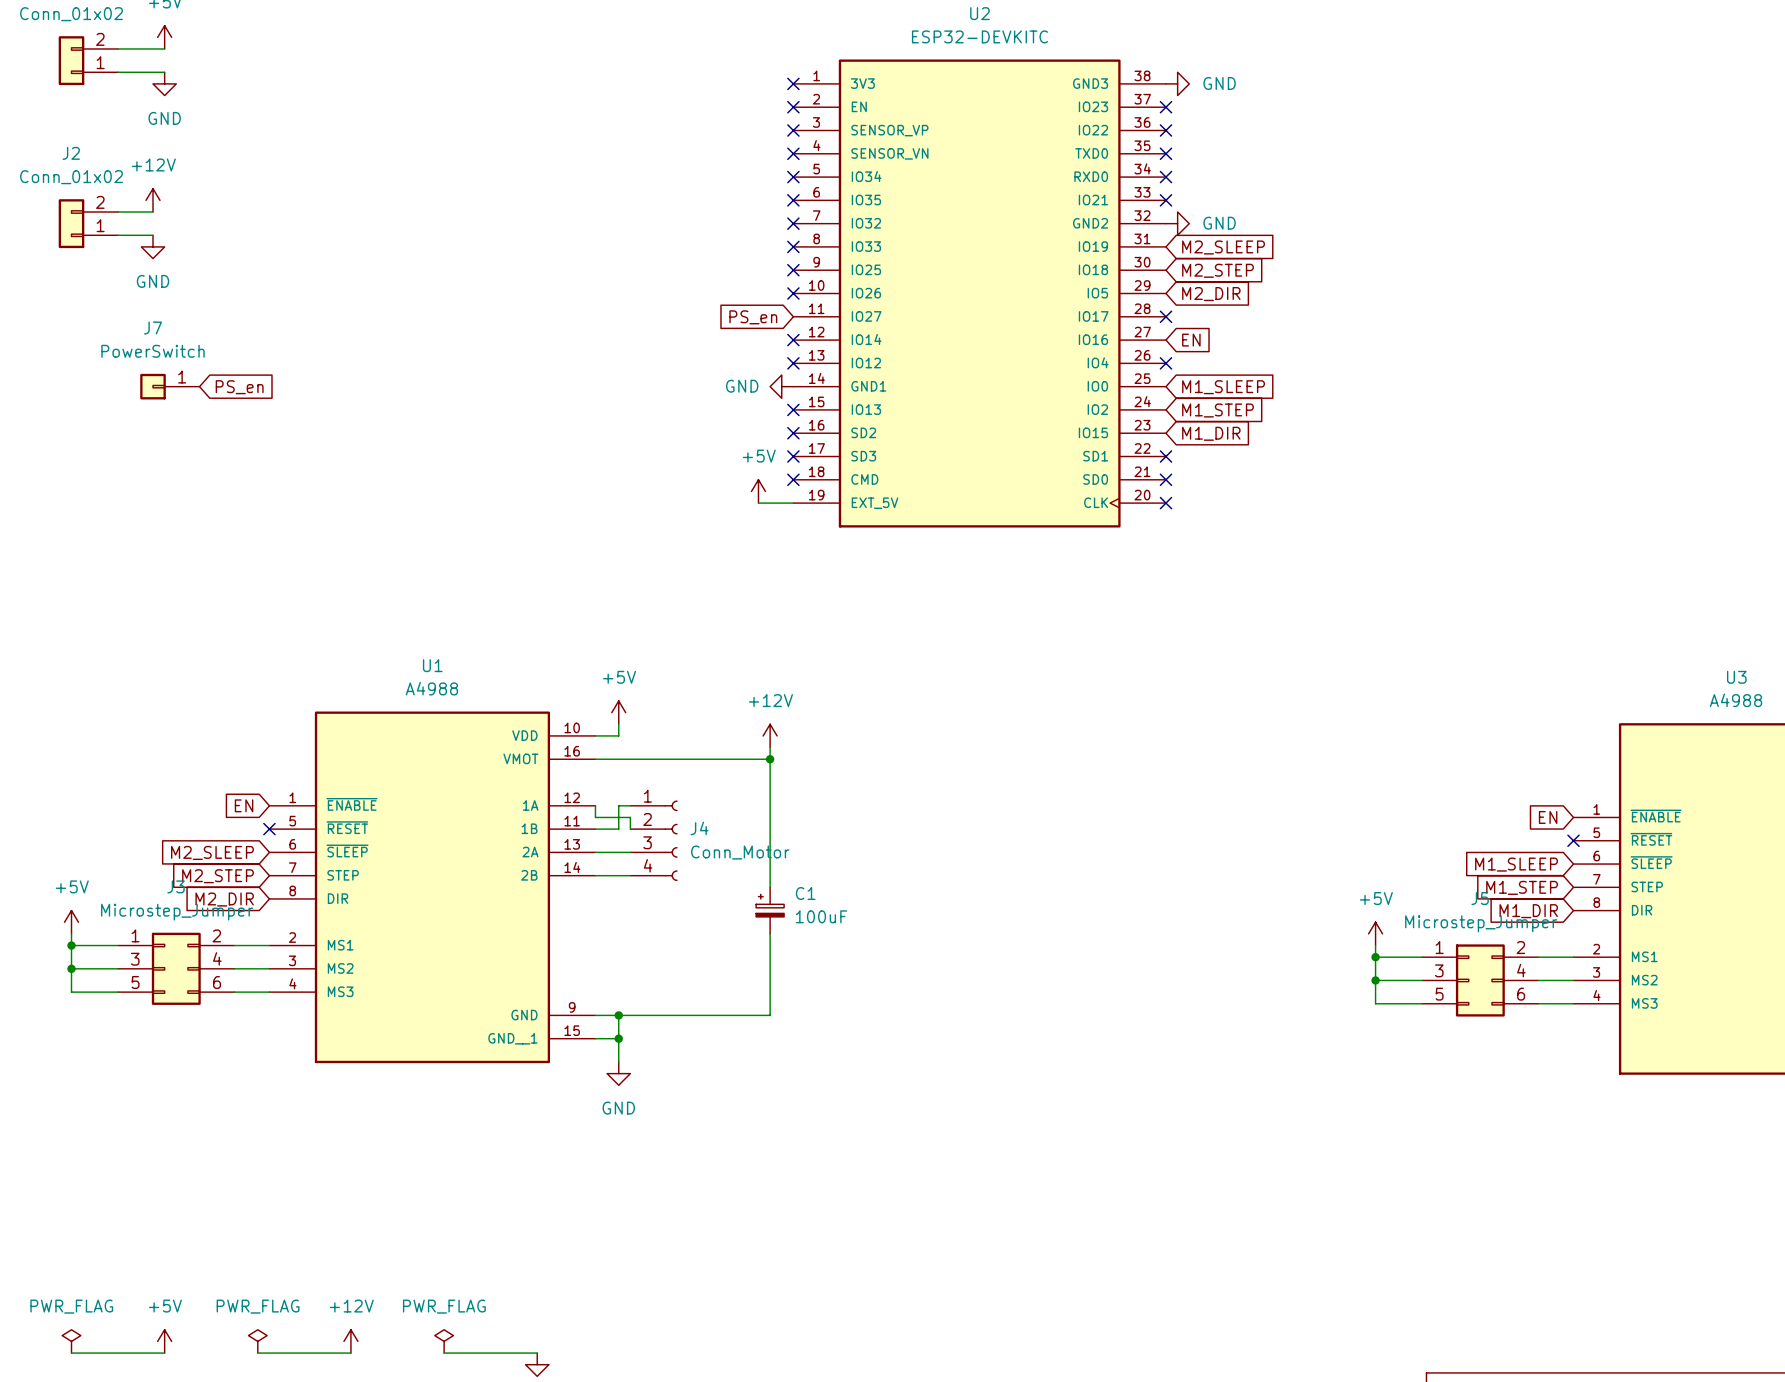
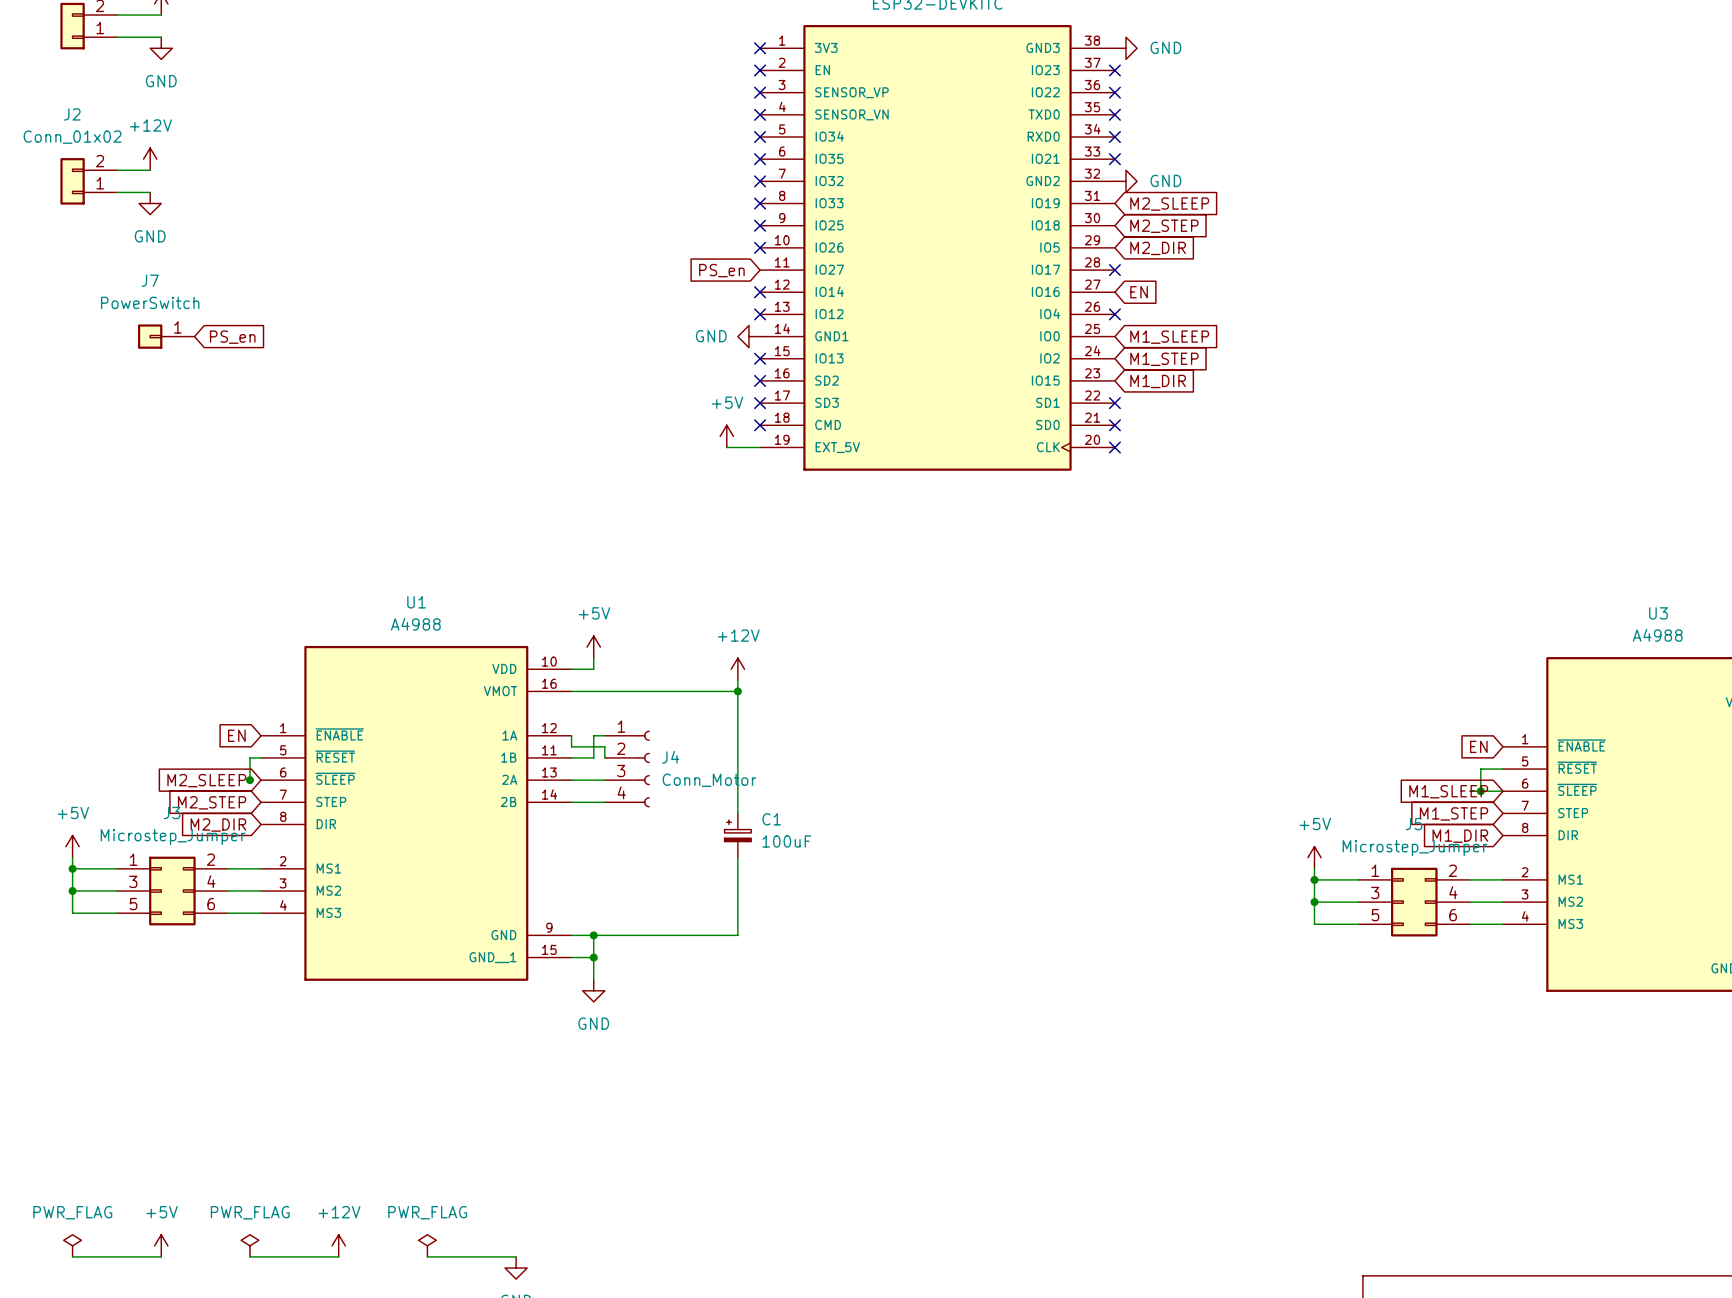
wire: none -> (261, 757) (249, 757) (249, 780)
no-connect mark: (269, 829) -> none
wire: none -> (1503, 769) (1480, 769) (1480, 791)
no-connect mark: (1573, 840) -> none
junction: none -> (249, 780)
wire: none -> (1469, 791) (1503, 791)
junction: none -> (1480, 791)

